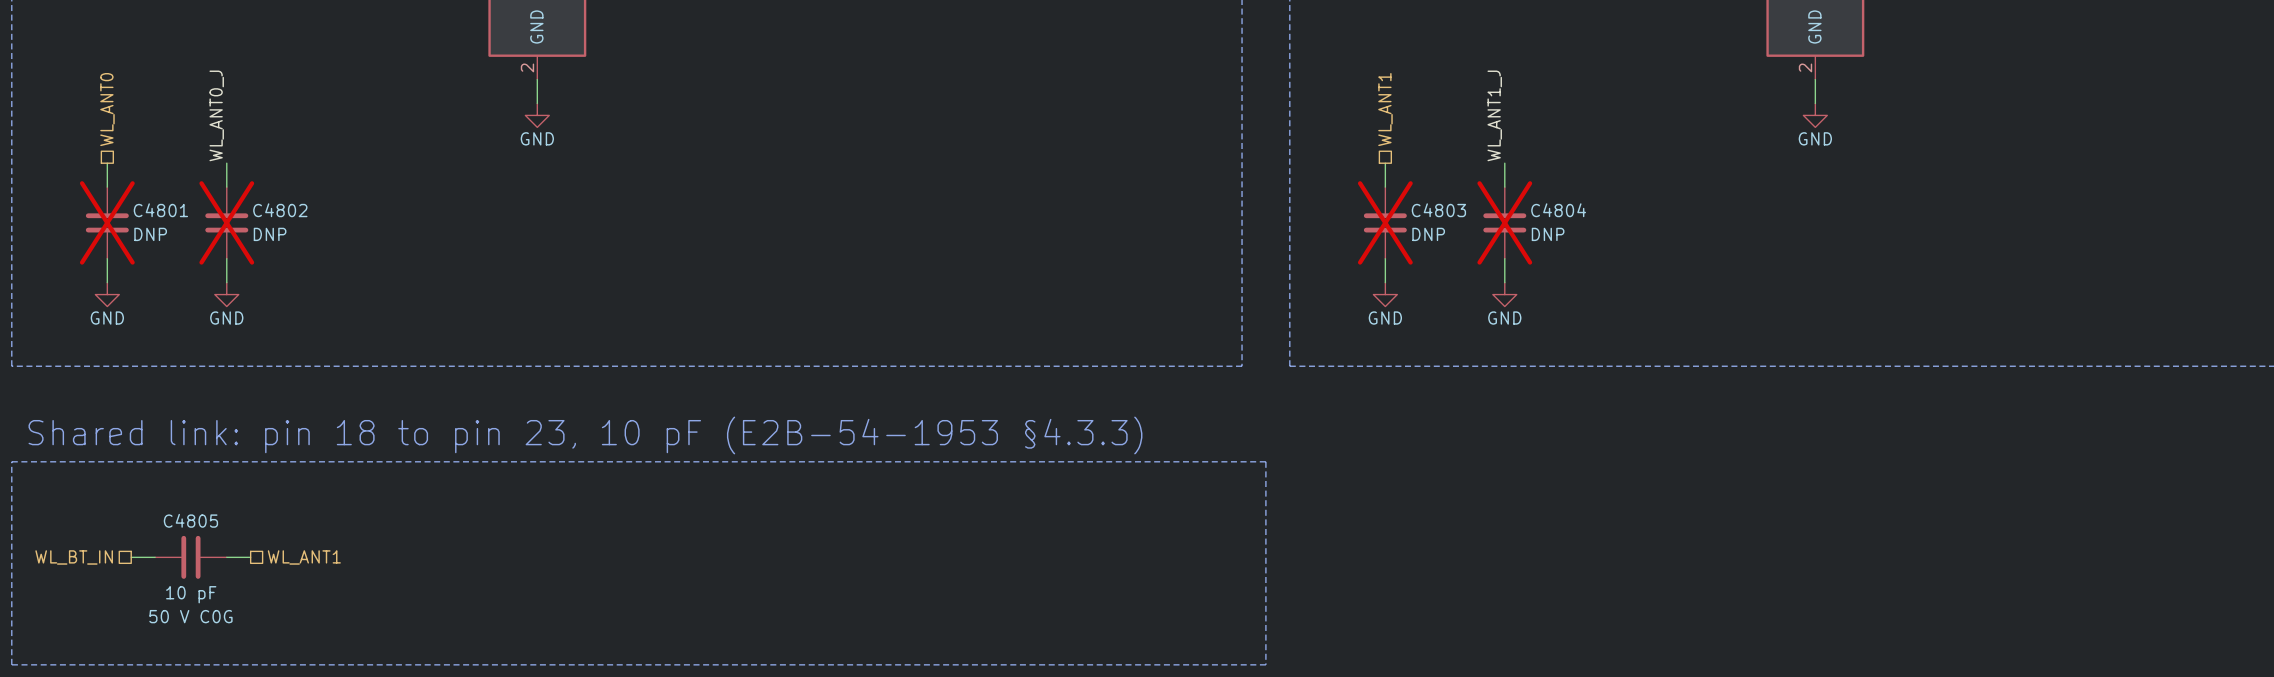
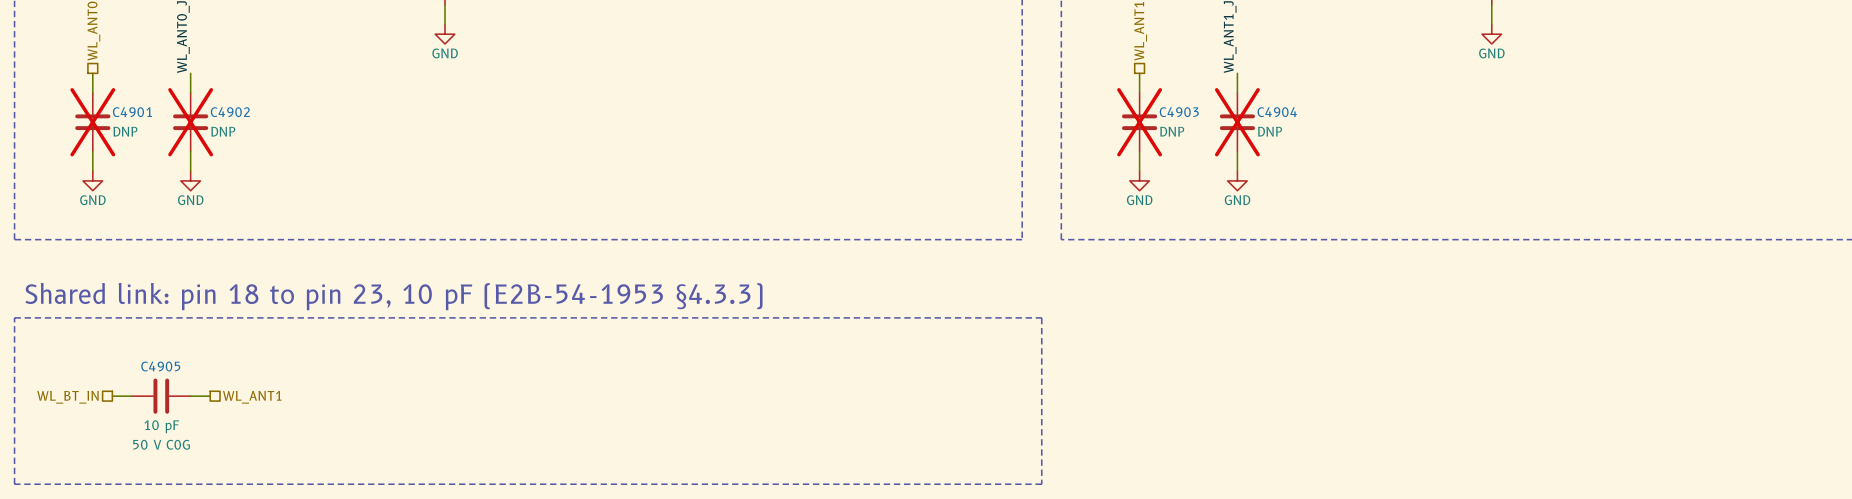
C4801 name: C4801 (160, 210) -> C4901 (132, 112)
C4802 name: C4802 (280, 210) -> C4902 (230, 112)
C4803 name: C4803 (1438, 210) -> C4903 (1179, 112)
C4804 name: C4804 (1558, 210) -> C4904 (1277, 112)
C4805 name: C4805 (190, 520) -> C4905 (160, 366)

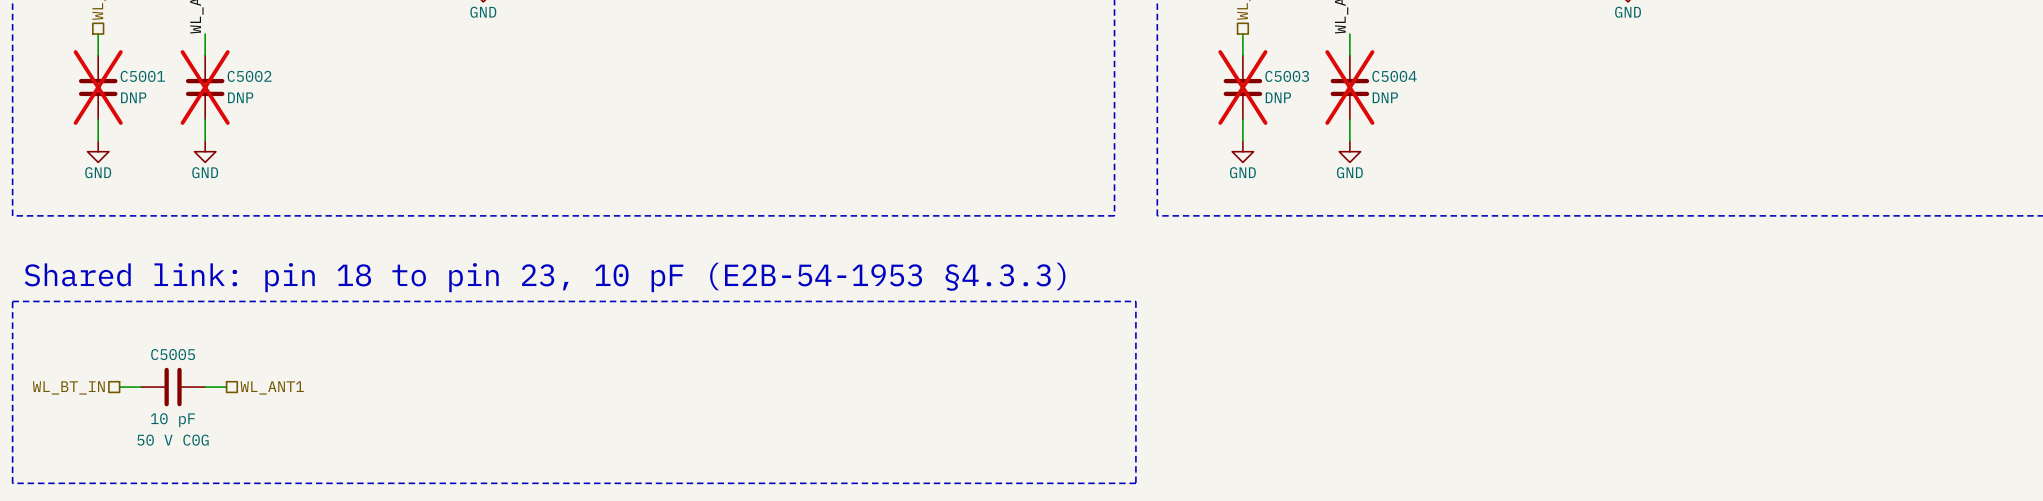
C4901 name: C4901 (132, 112) -> C5001 (142, 76)
C4902 name: C4902 (230, 112) -> C5002 (249, 76)
C4903 name: C4903 (1179, 112) -> C5003 (1287, 76)
C4904 name: C4904 (1277, 112) -> C5004 (1394, 76)
C4905 name: C4905 (160, 366) -> C5005 (173, 354)

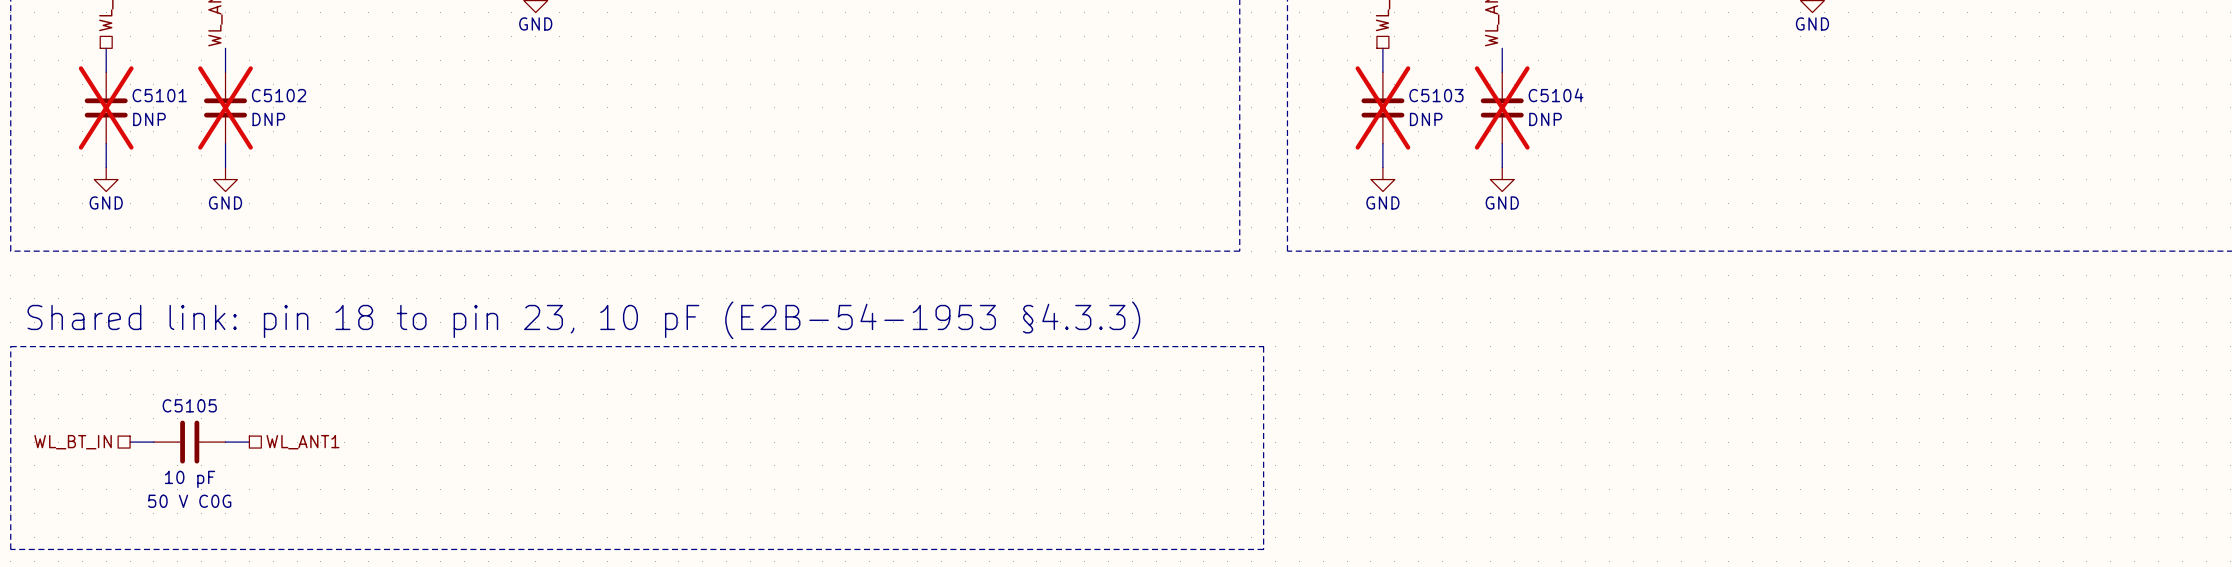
C5001 name: C5001 (142, 76) -> C5101 (159, 95)
C5002 name: C5002 (249, 76) -> C5102 (279, 95)
C5003 name: C5003 (1287, 76) -> C5103 (1436, 95)
C5004 name: C5004 (1394, 76) -> C5104 (1556, 95)
C5005 name: C5005 (173, 354) -> C5105 (189, 405)

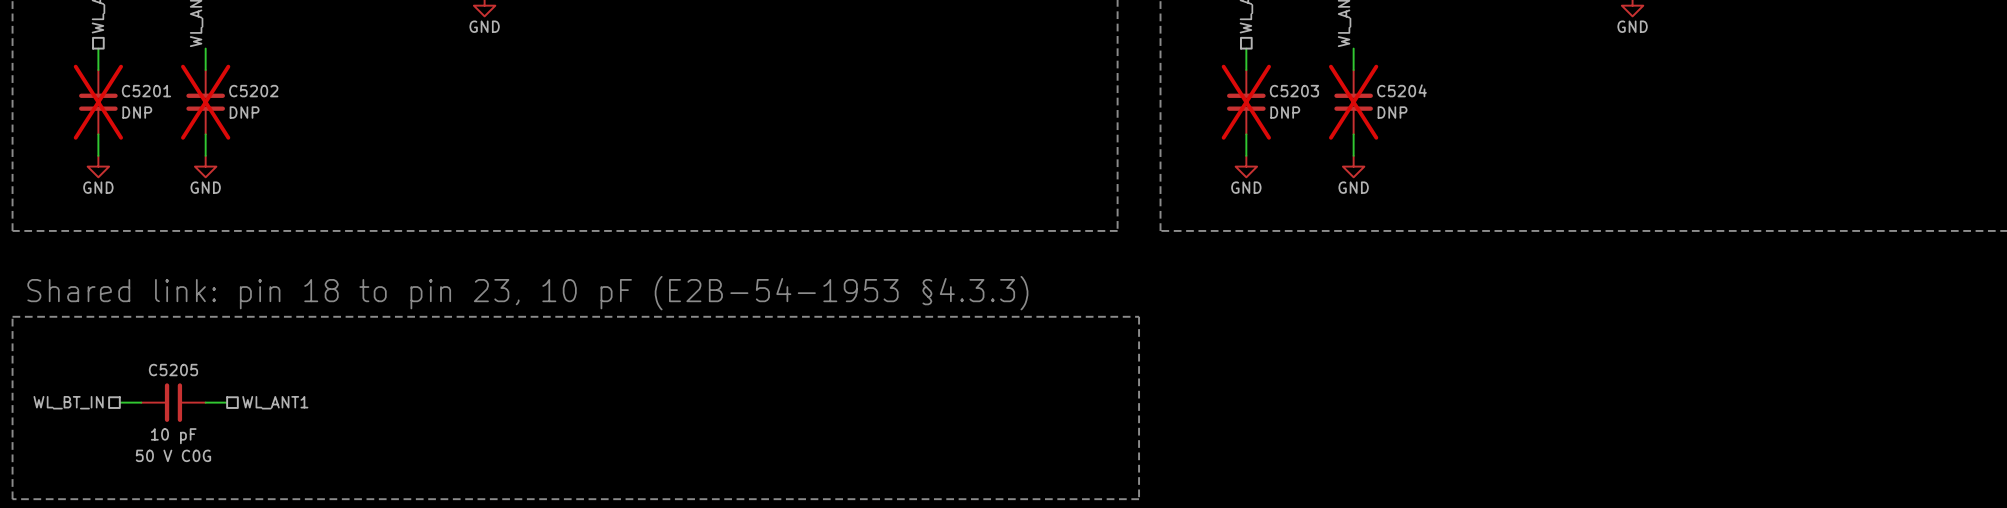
C5101 name: C5101 (159, 95) -> C5201 (146, 91)
C5102 name: C5102 (279, 95) -> C5202 (253, 91)
C5103 name: C5103 (1436, 95) -> C5203 (1294, 91)
C5104 name: C5104 (1556, 95) -> C5204 (1401, 90)
C5105 name: C5105 (189, 405) -> C5205 (173, 370)

